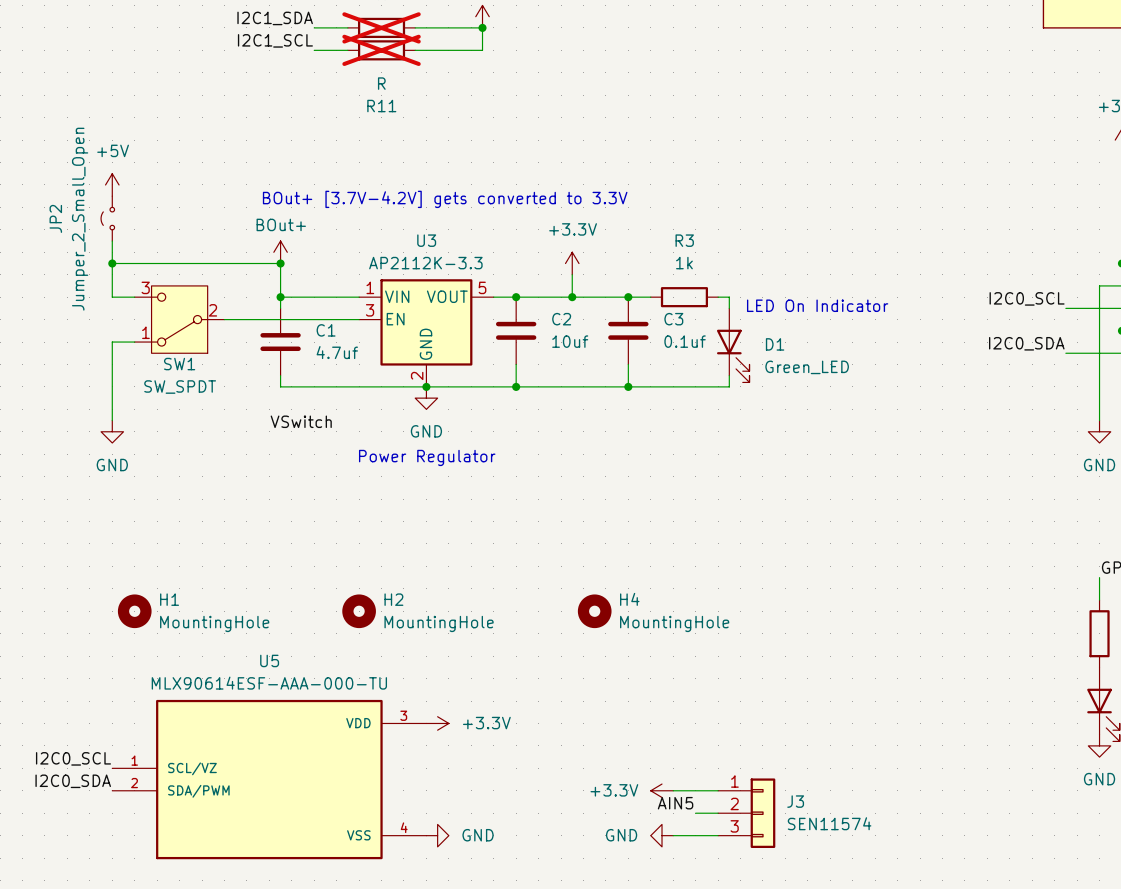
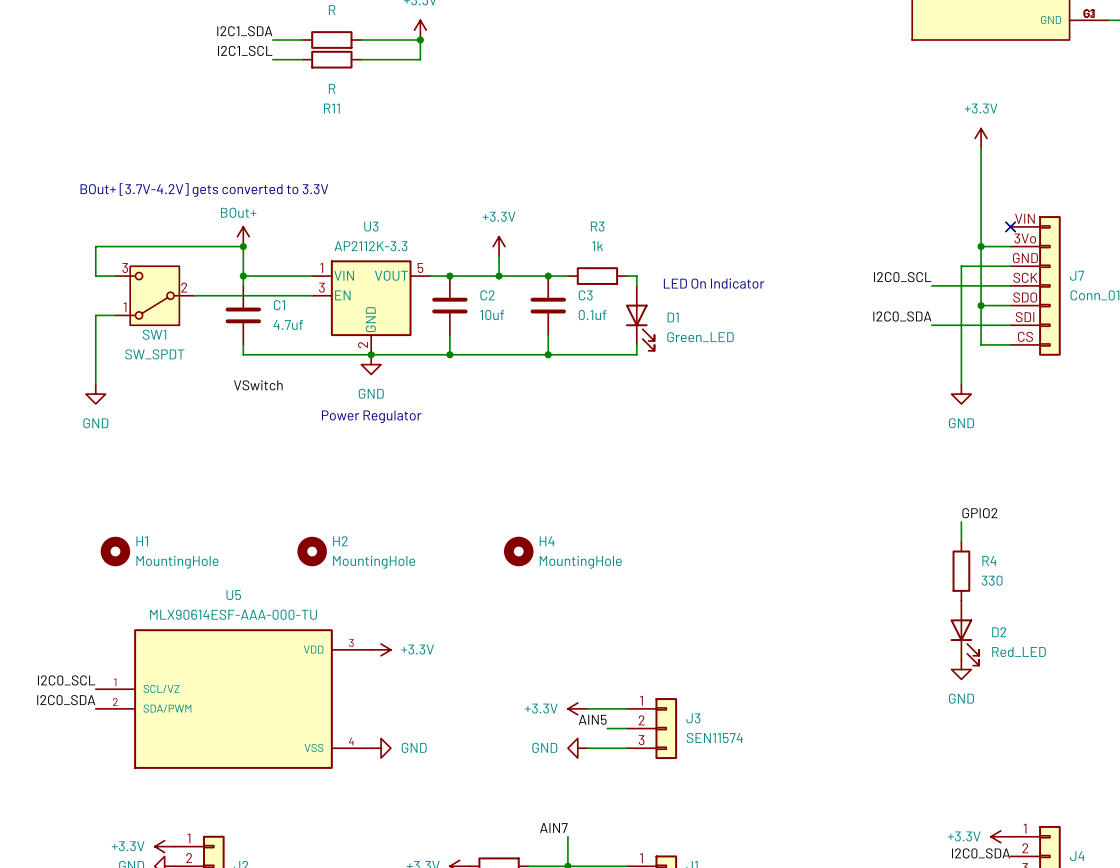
part do-not-place cross: (381, 27) -> none
R11 do-not-place cross: (381, 50) -> none
power symbol: +5V (112, 184) -> none
text position: BOut+ [3.7V-4.2V] gets converted to 3.3V (445, 199) -> BOut+ [3.7V-4.2V] gets converted to 3.3V (204, 190)
JP2: Jumper_2_Small_Open (107, 218) -> none
wire: (112, 241) (112, 263) -> none
junction: (112, 263) -> none

